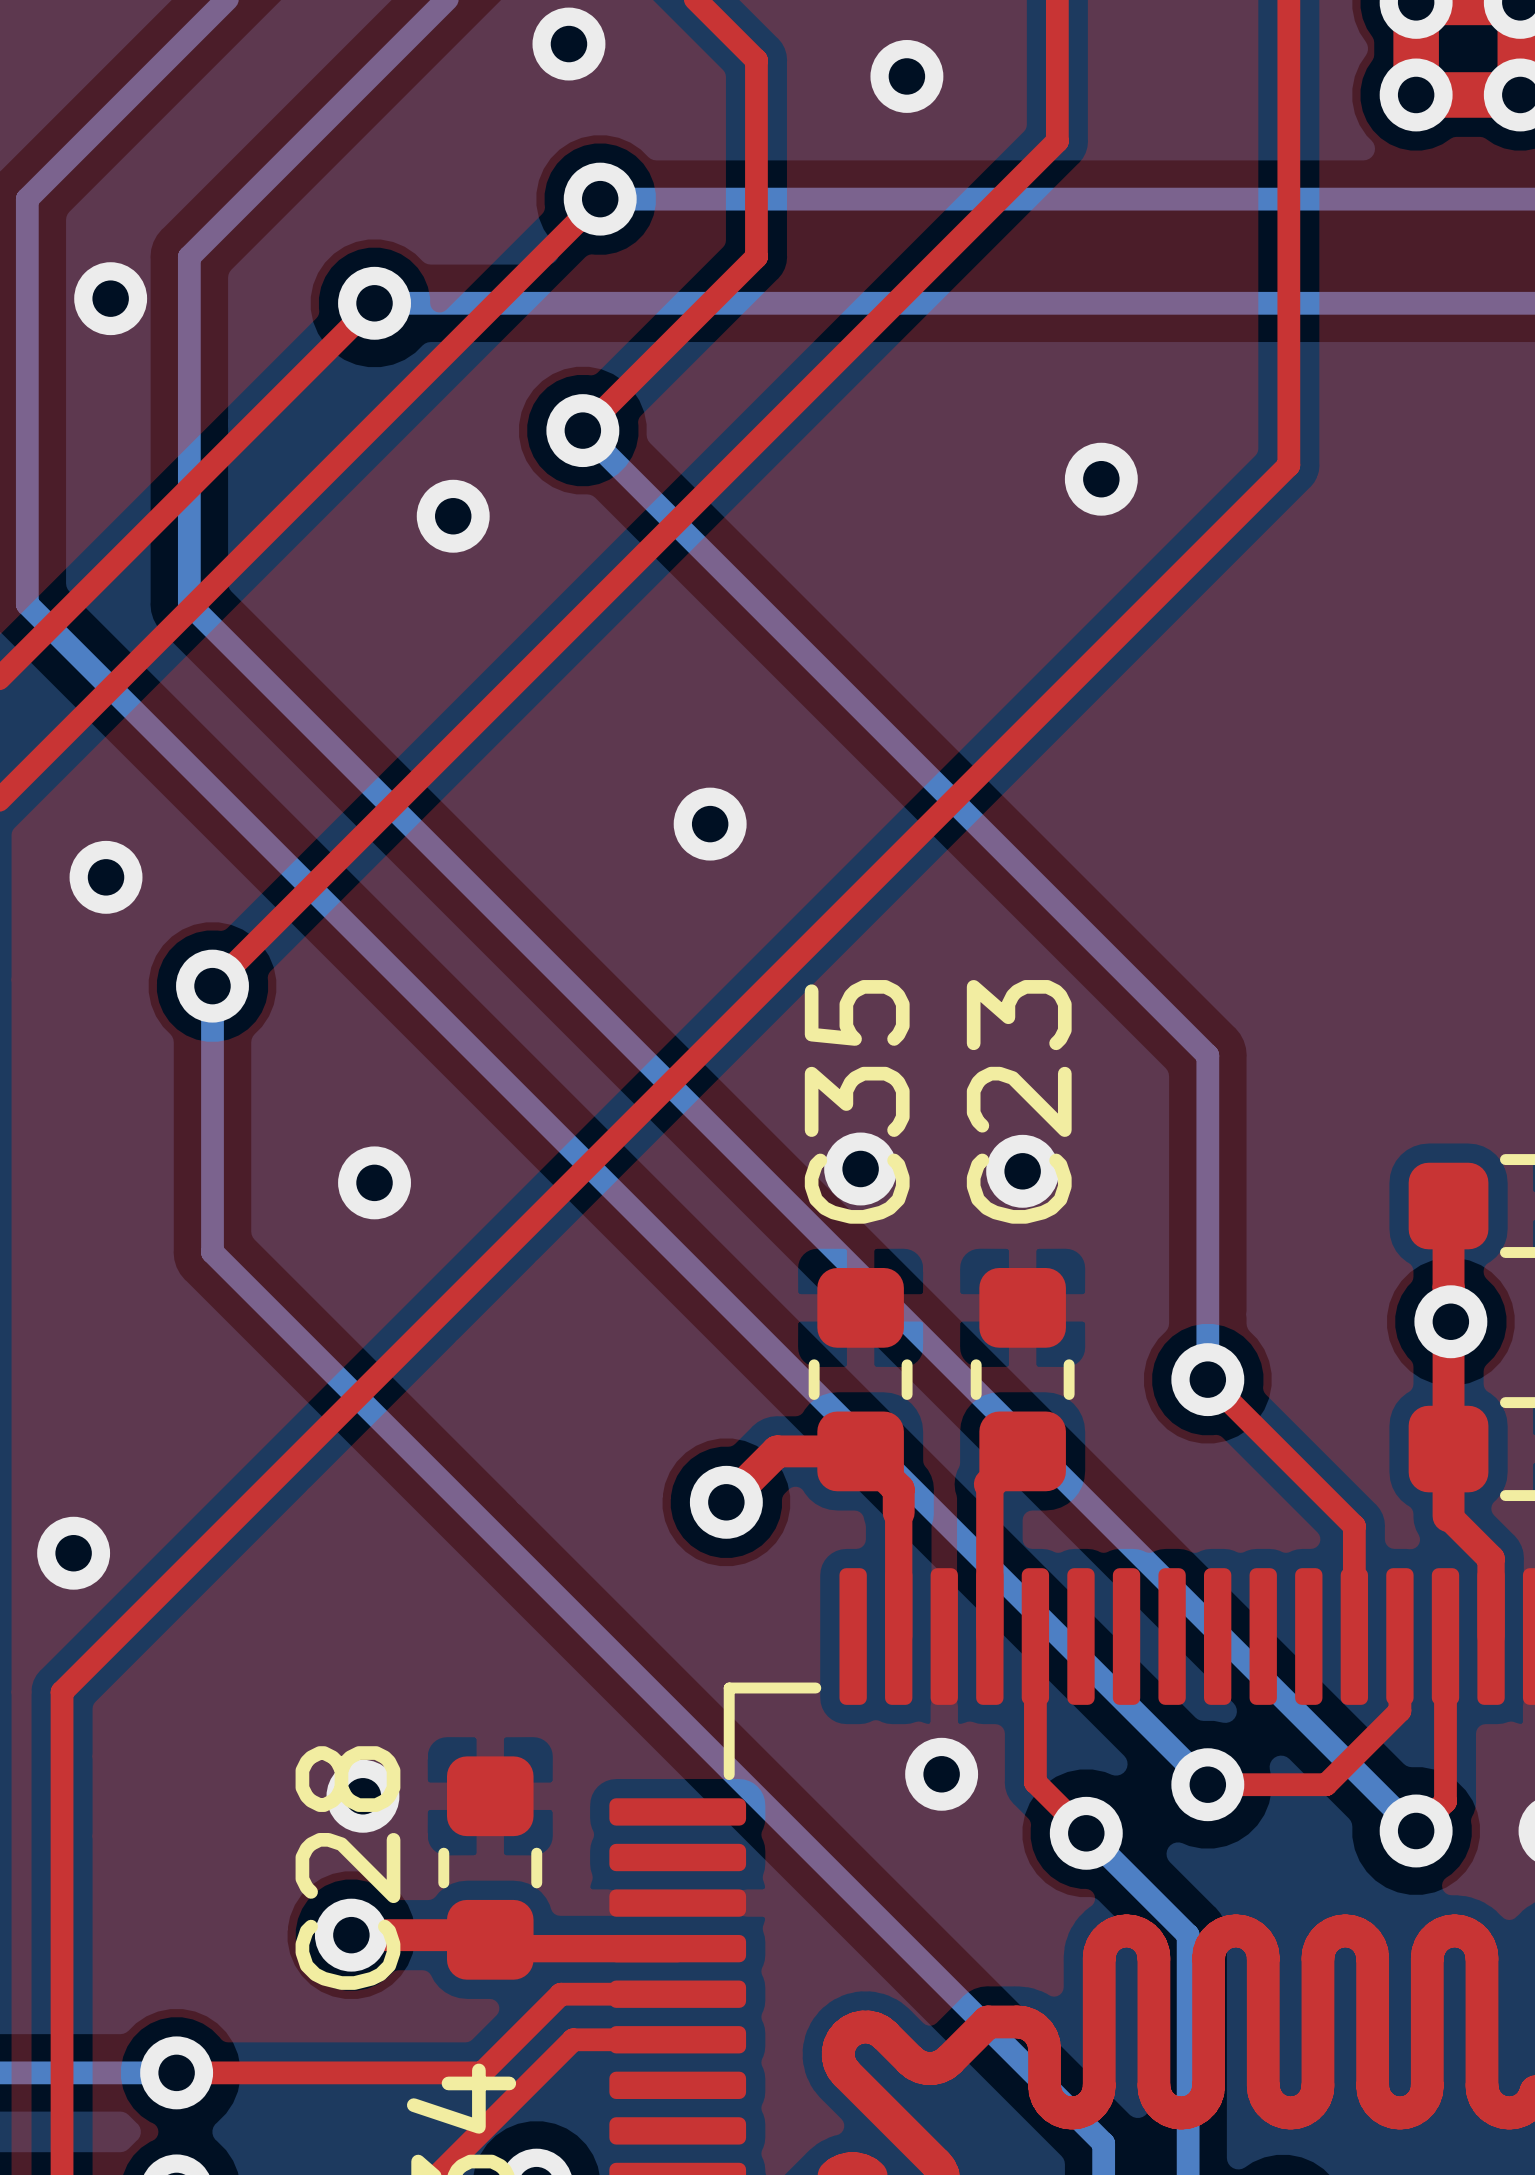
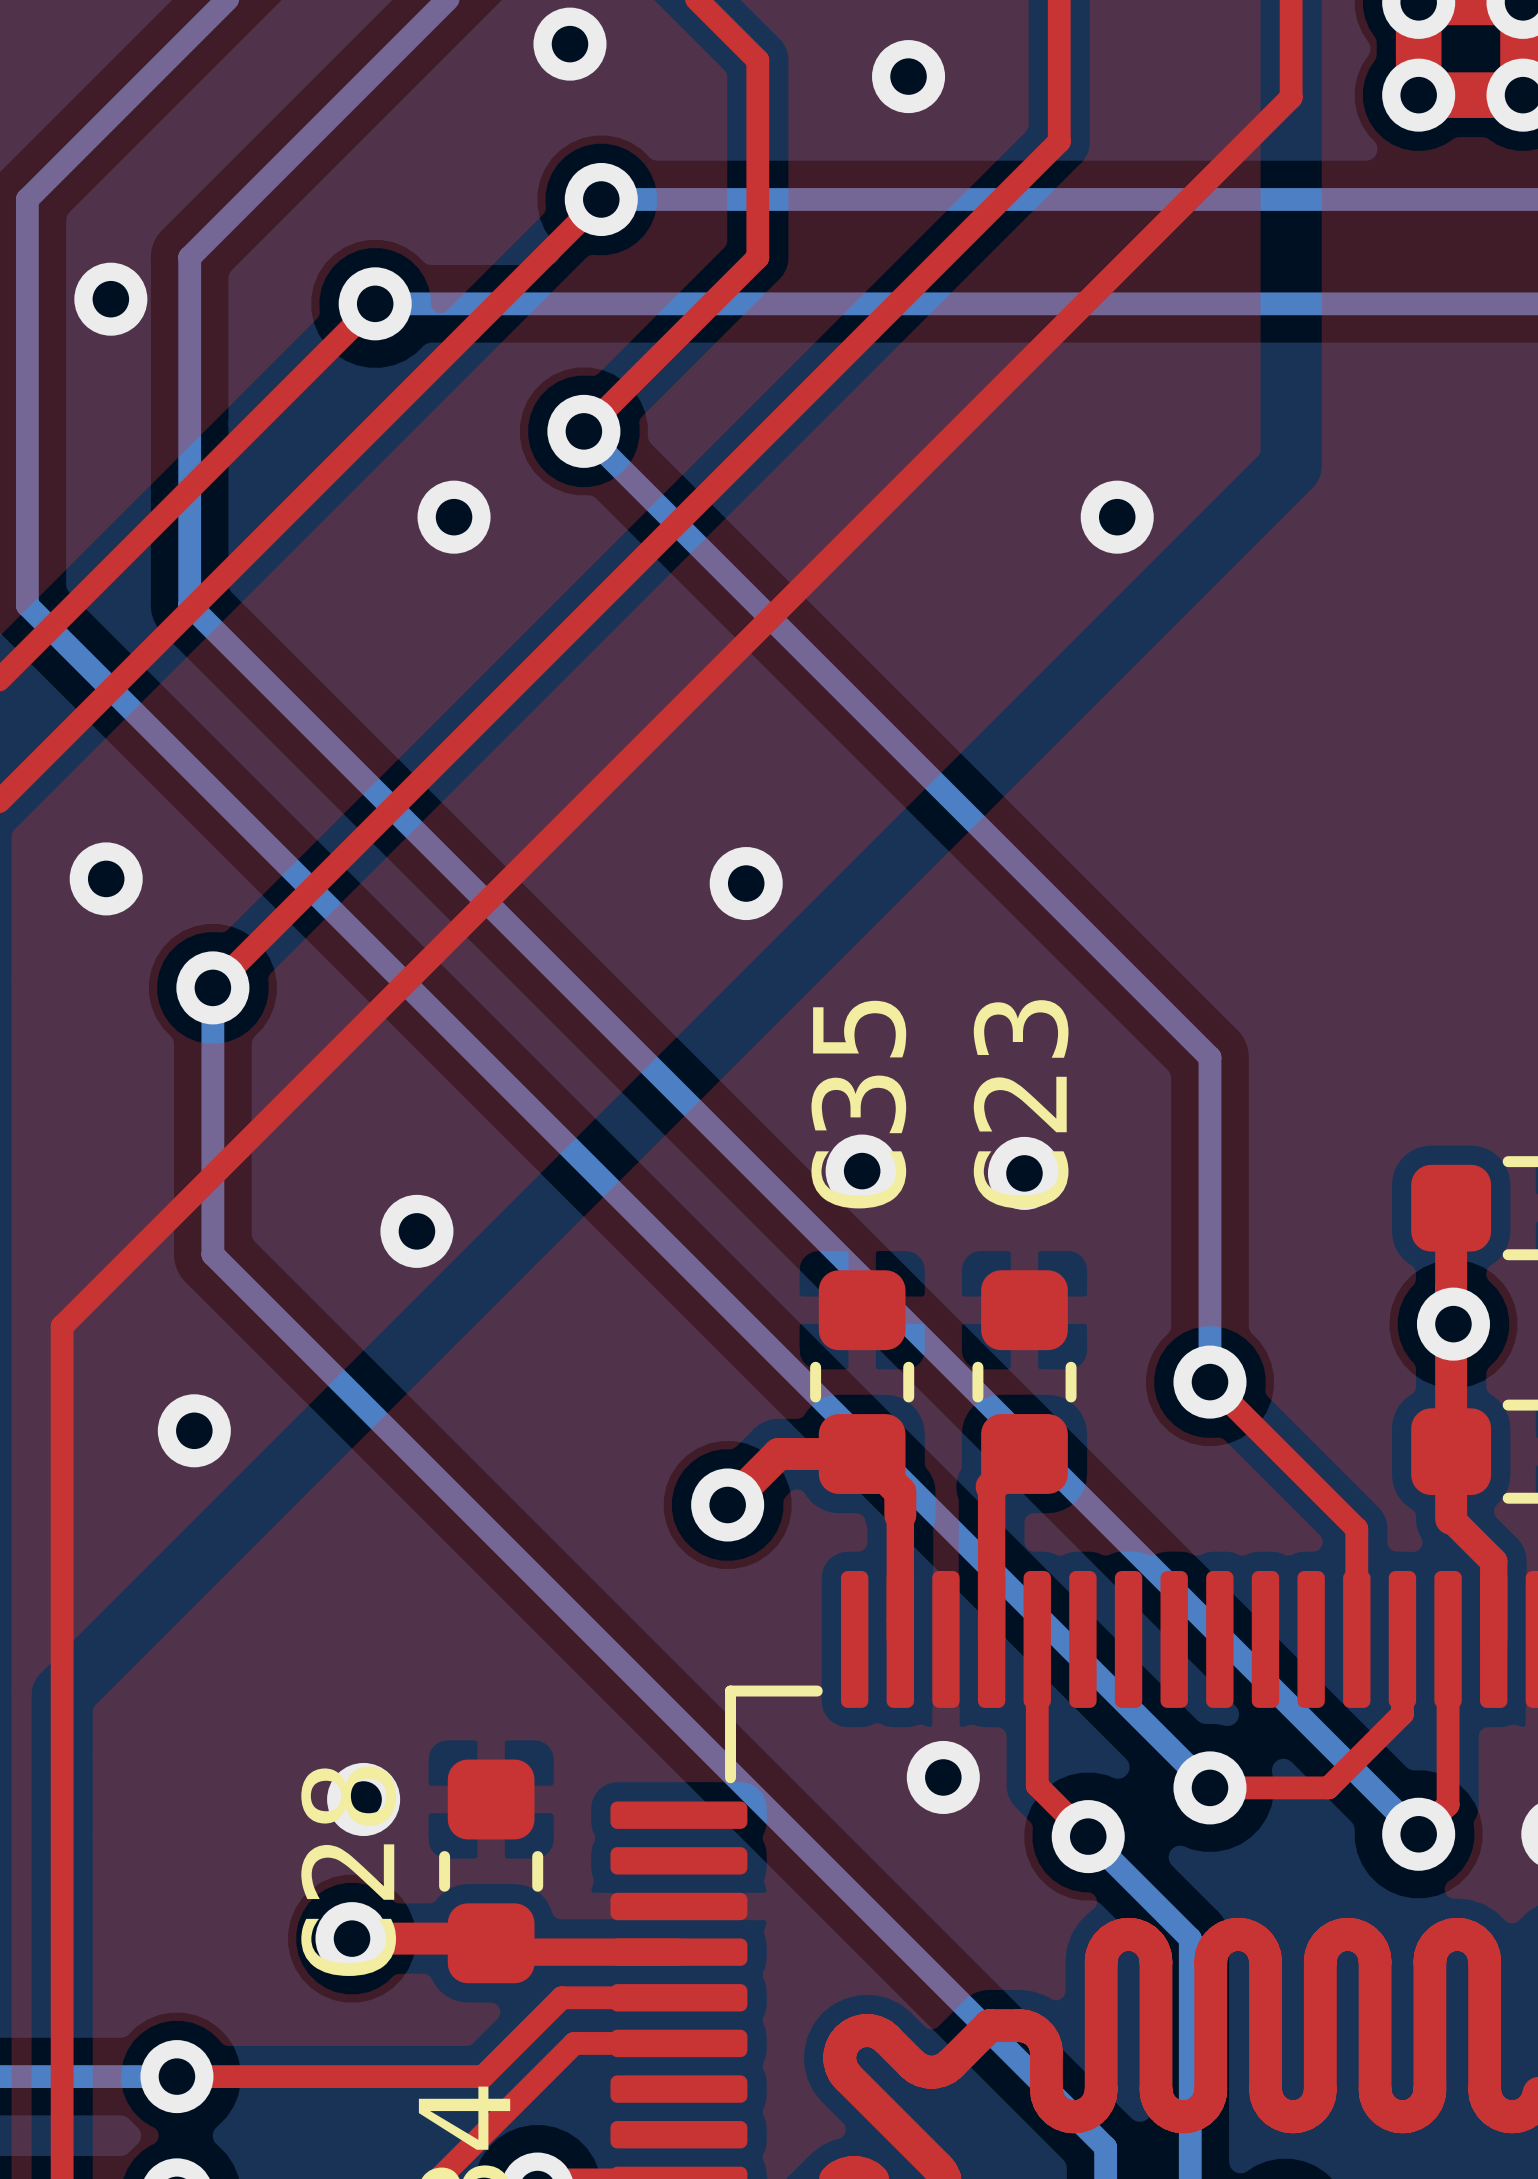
top track: (1288, 97) (1288, 465) (62, 1692) -> (1291, 97) (62, 1326) (62, 1695)
via position: (1101, 479) -> (1117, 517)
via position: (710, 824) -> (746, 883)
via position: (374, 1182) -> (416, 1231)
via: none -> (194, 1430)
via: (73, 1553) -> none

